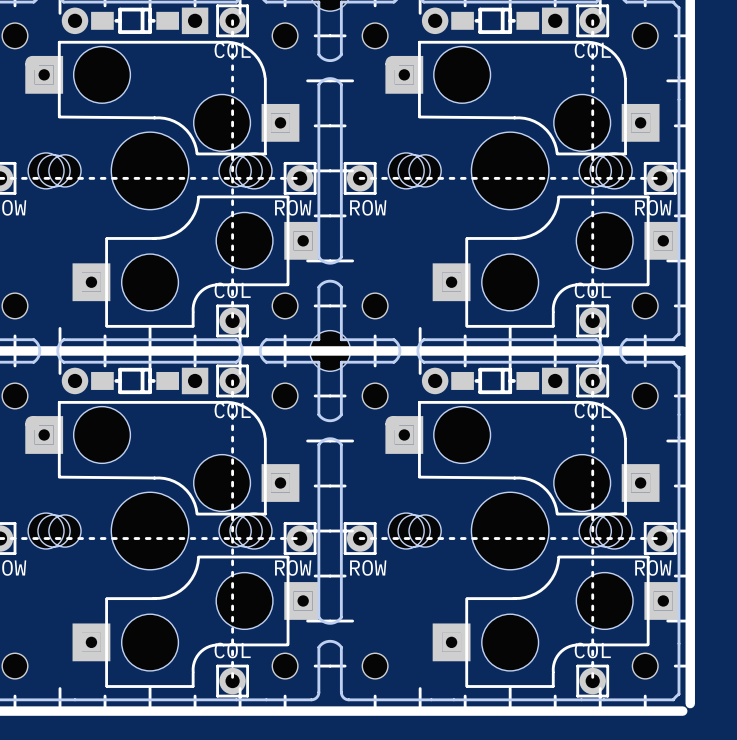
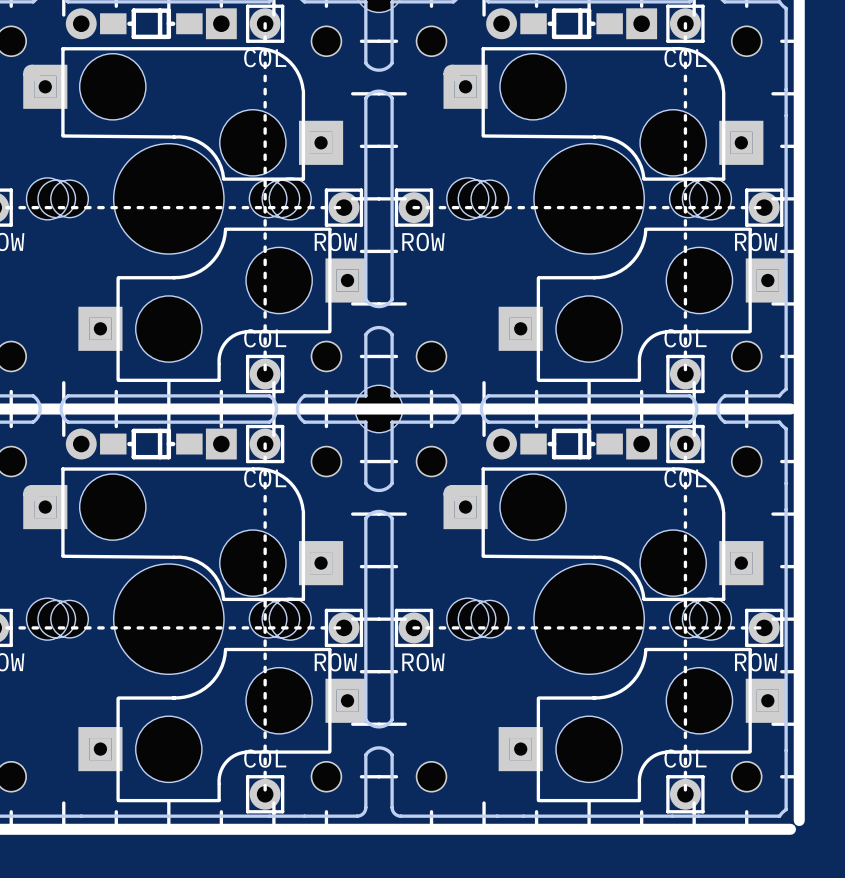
part footprint: [25, 40, 319, 328] -> [23, 46, 366, 382]
part footprint: [385, 40, 679, 328] -> [443, 46, 786, 382]
part footprint: [25, 400, 319, 688] -> [23, 467, 366, 803]
part footprint: [385, 400, 679, 688] -> [443, 467, 786, 803]

